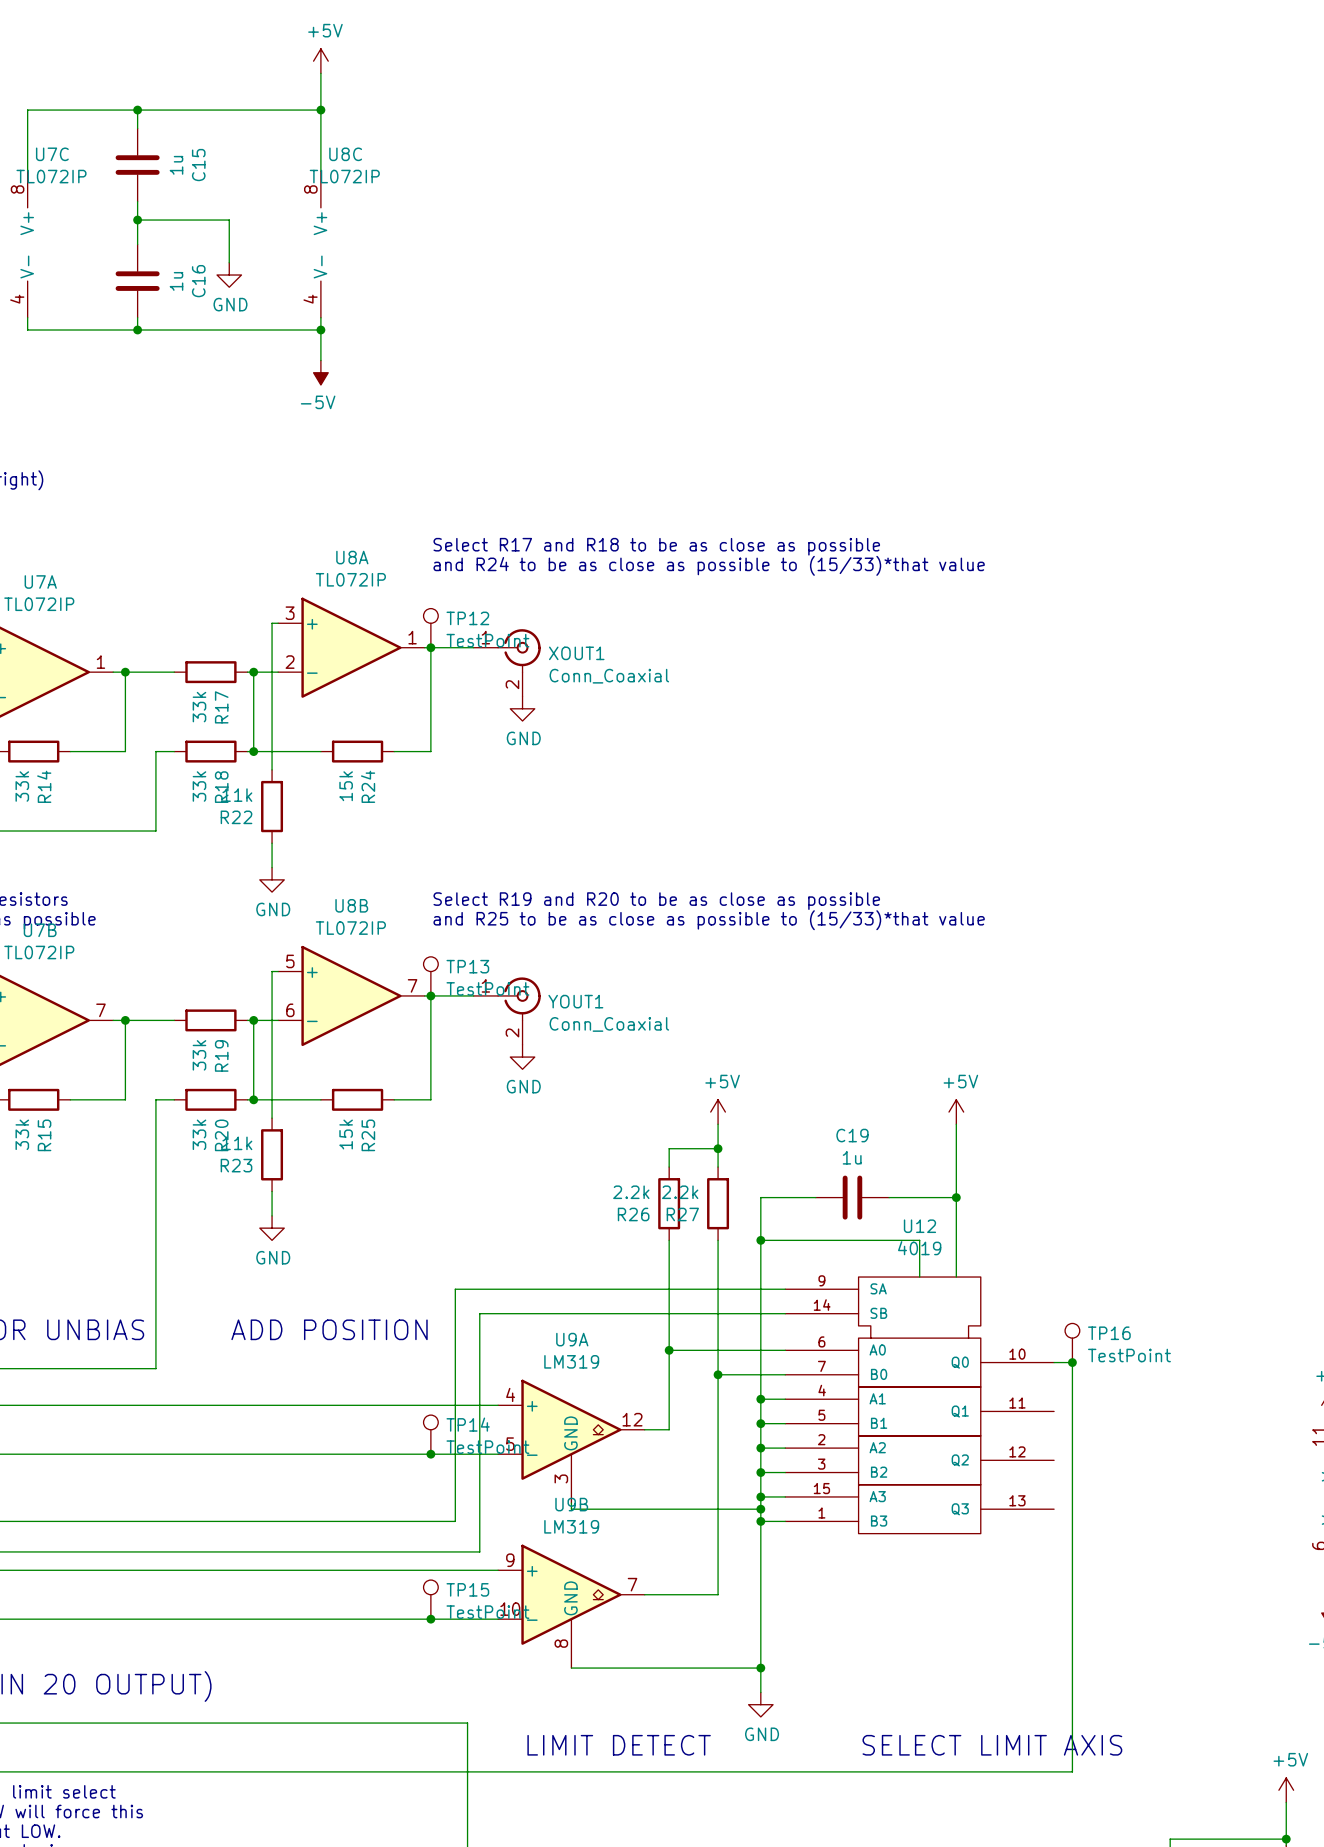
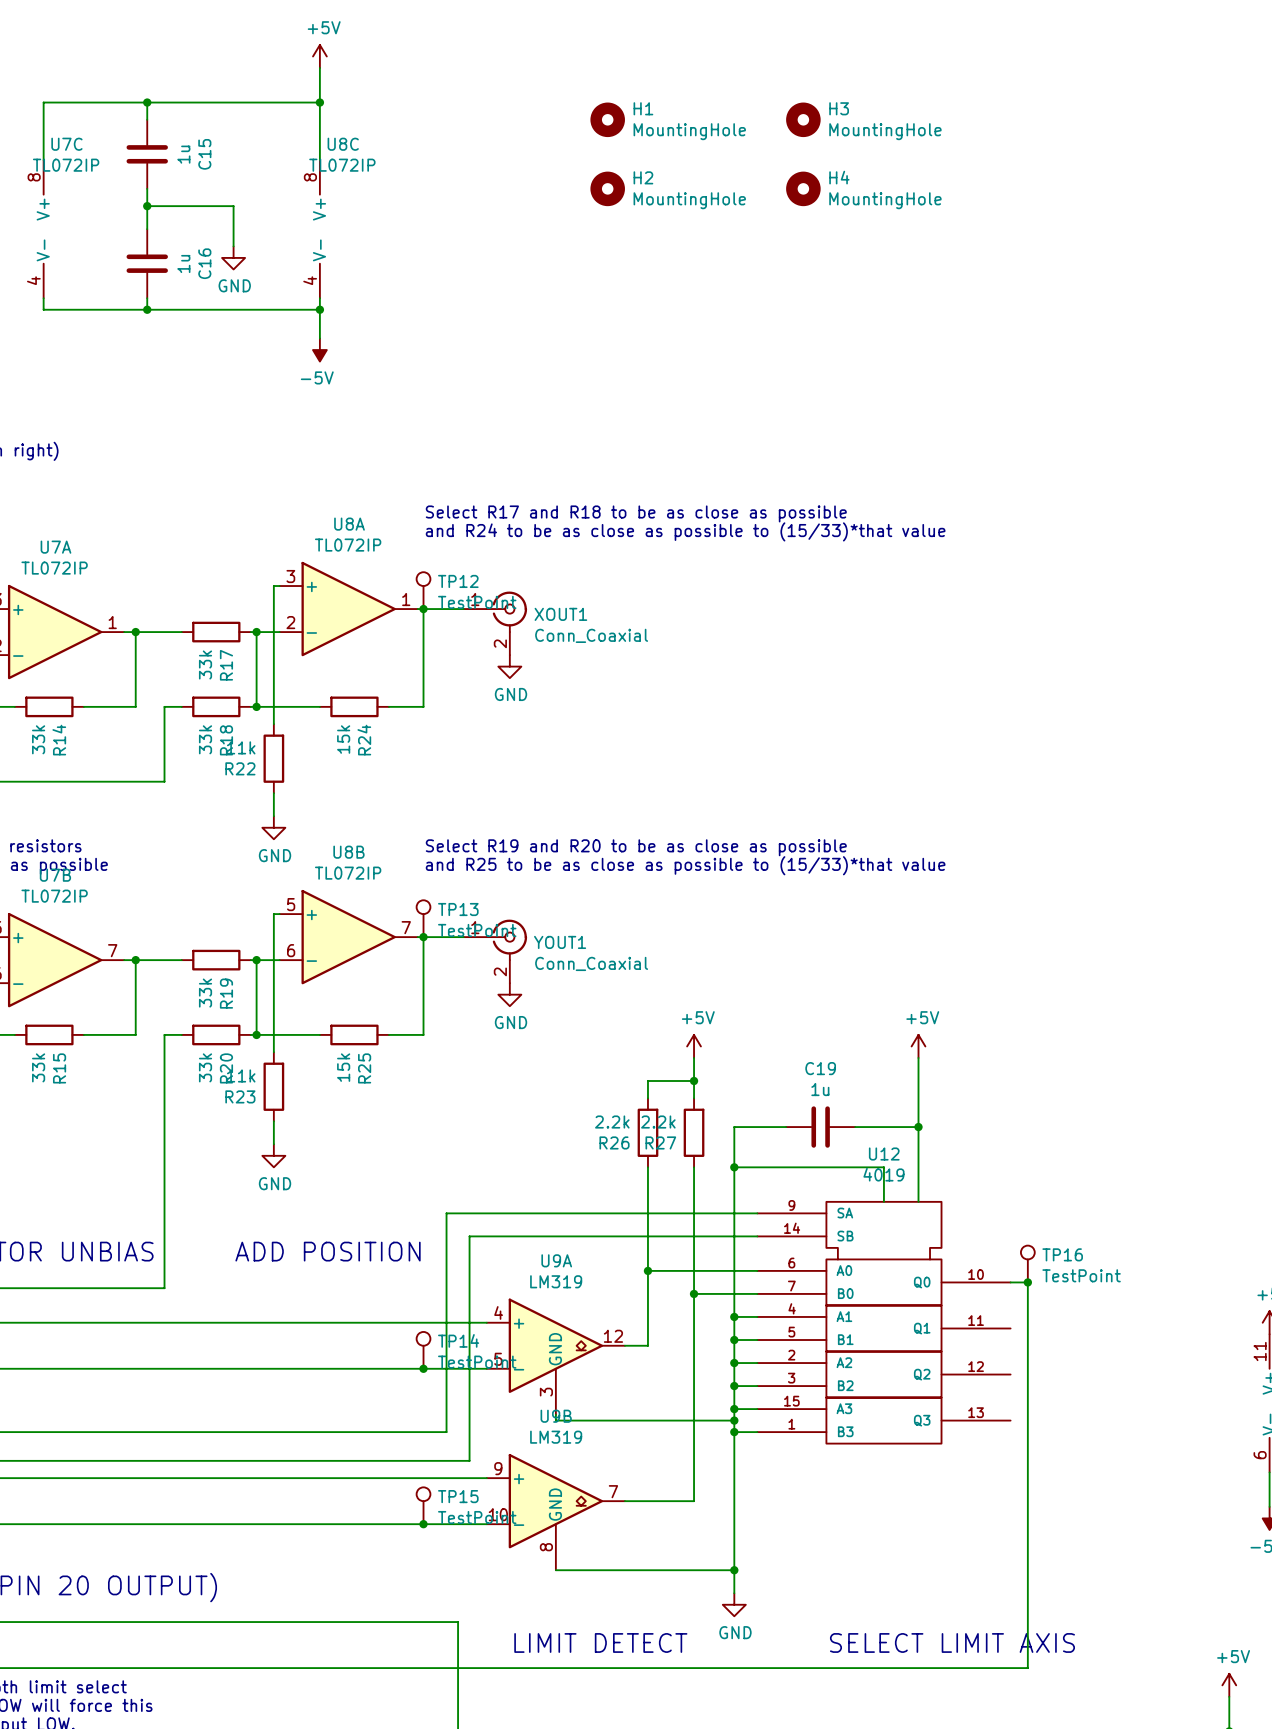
H1: none -> MountingHole (607, 119)
H3: none -> MountingHole (803, 119)
H2: none -> MountingHole (607, 188)
H4: none -> MountingHole (803, 188)

